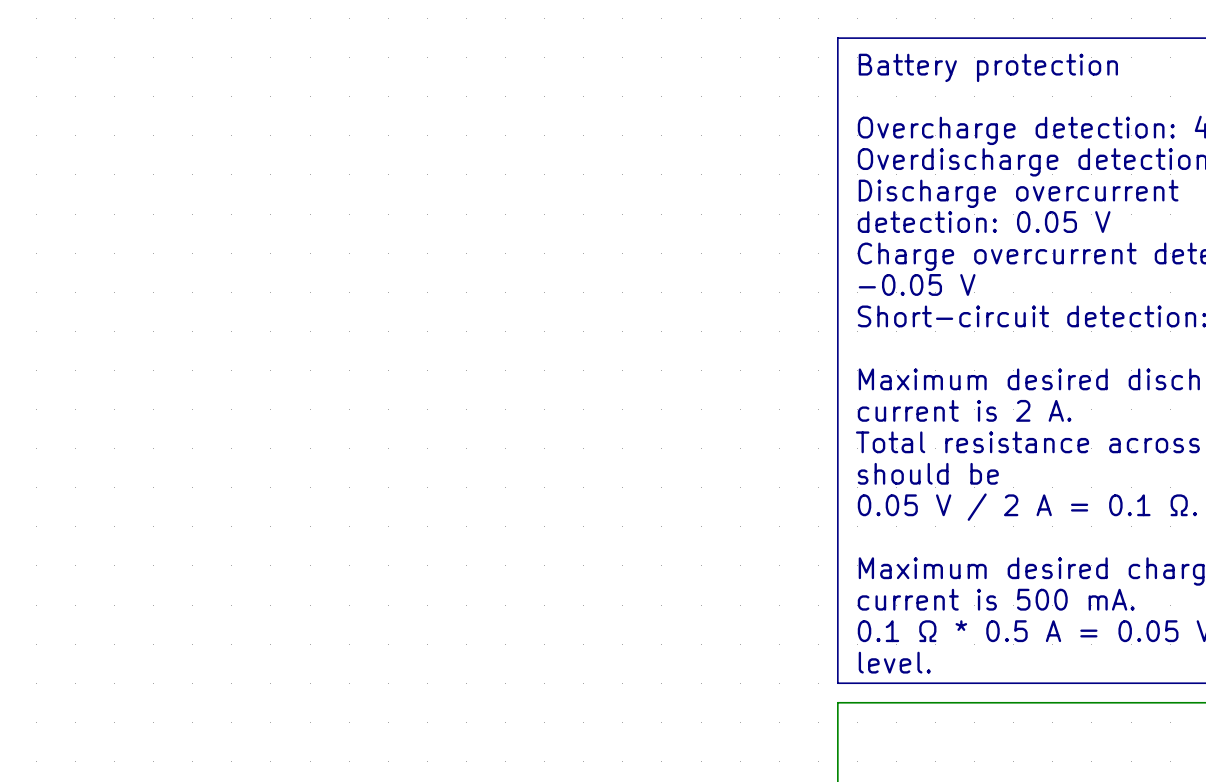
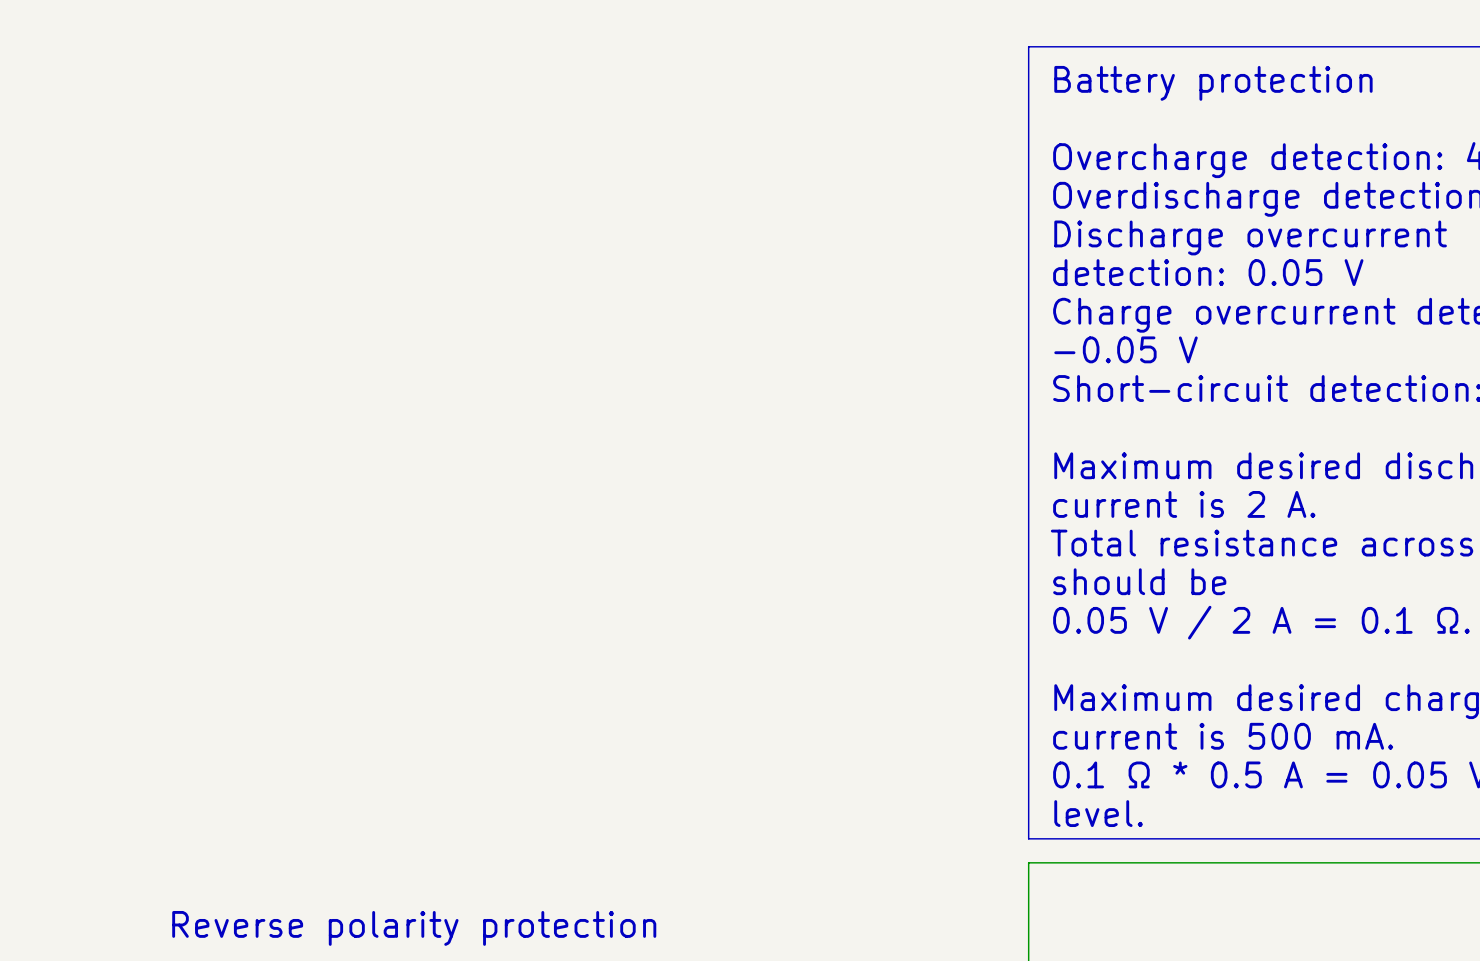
text: none -> Reverse polarity protection (414, 928)

